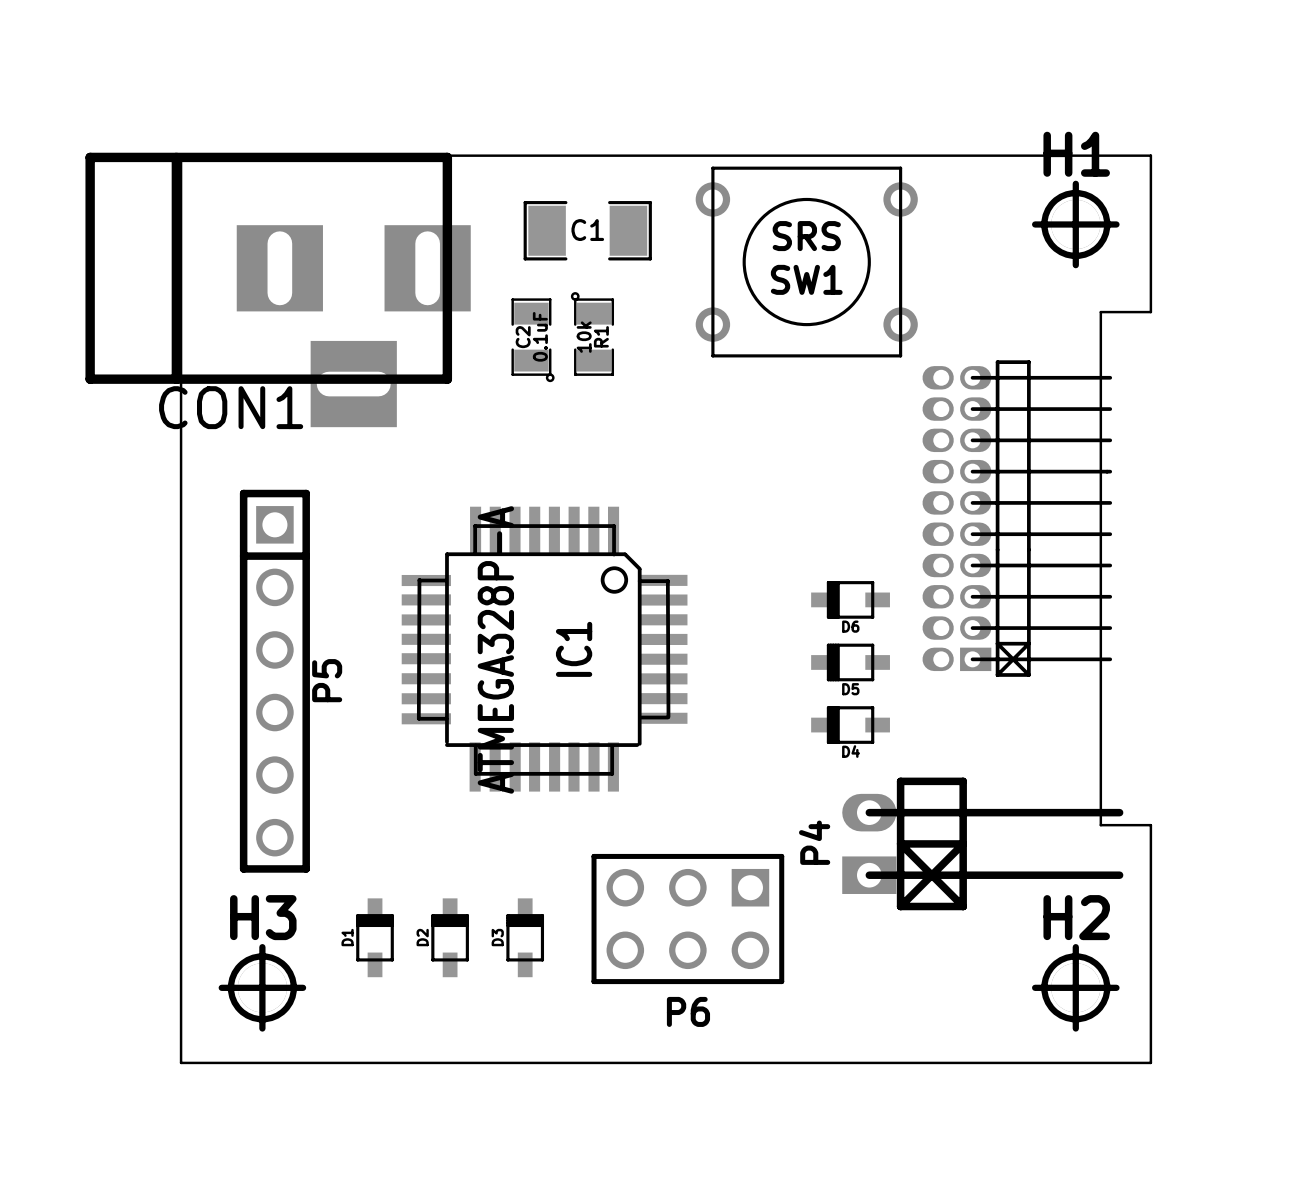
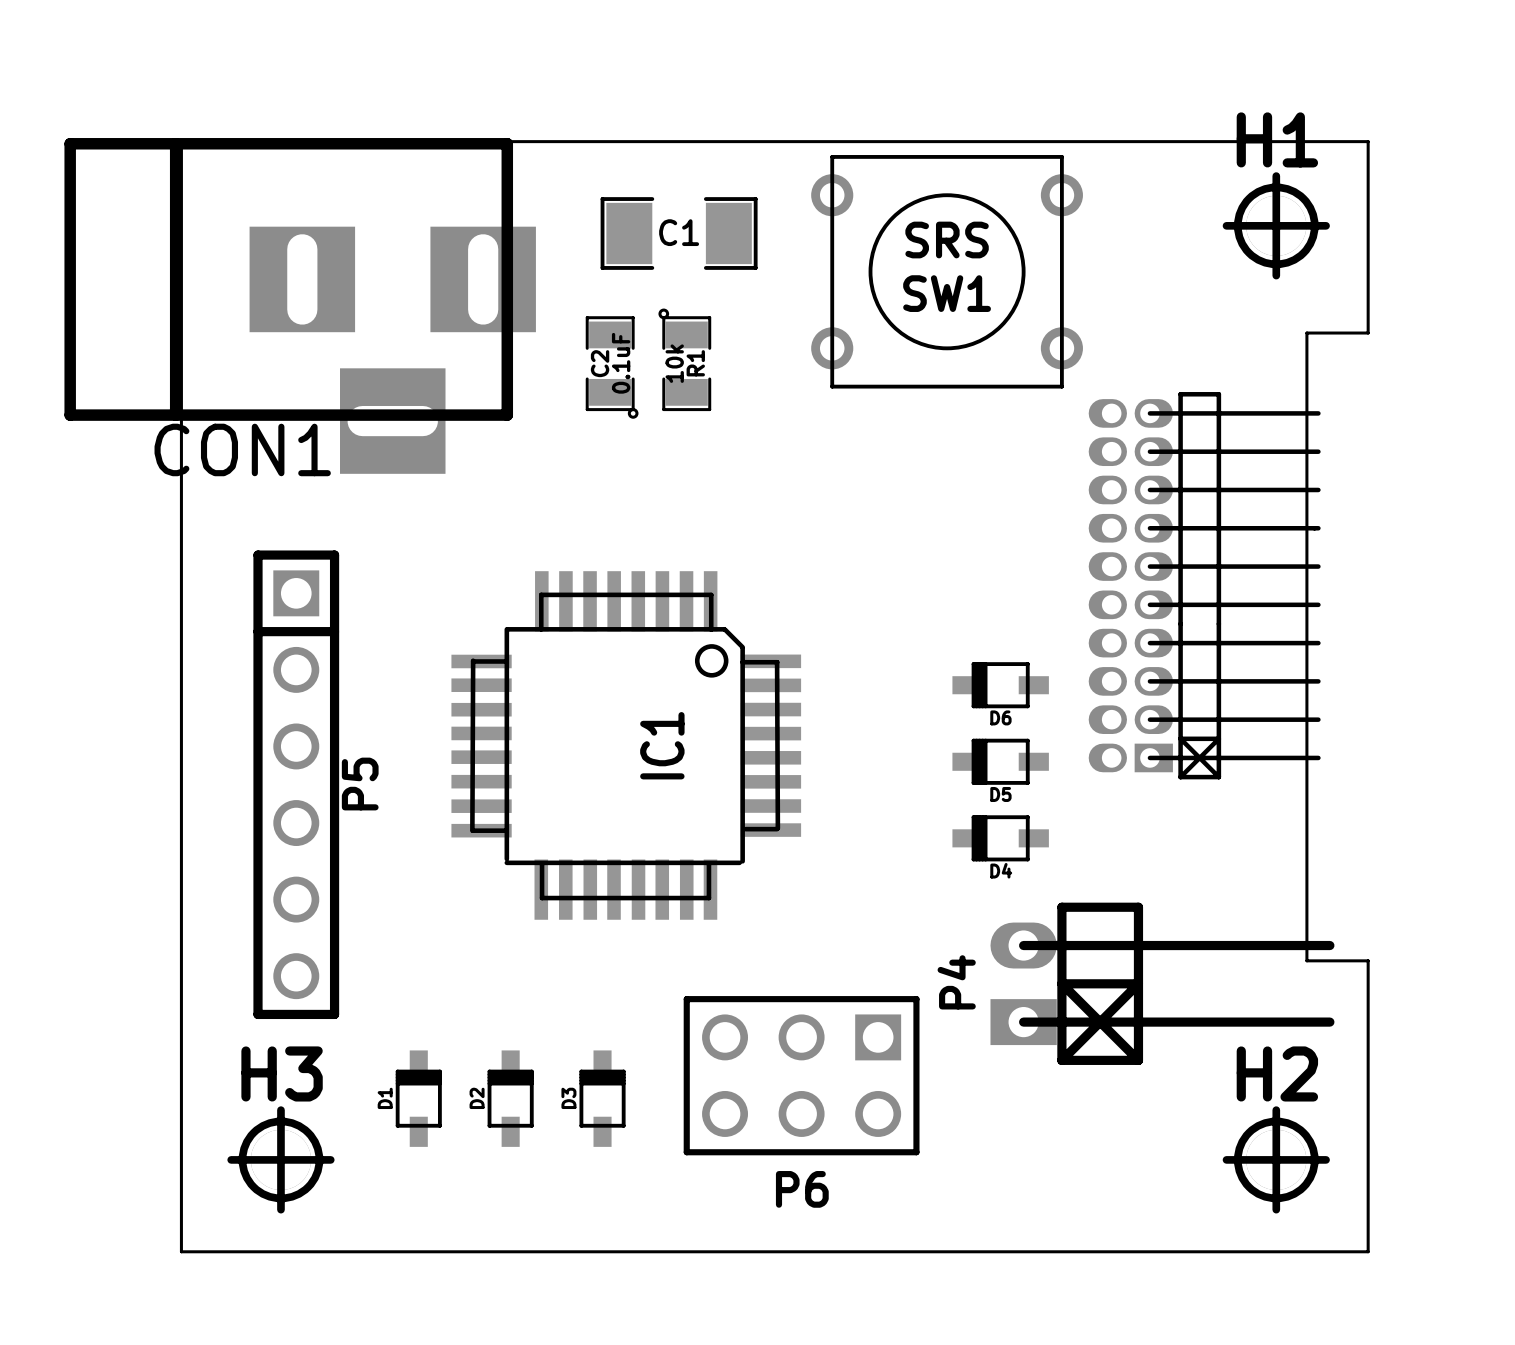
IC1 value: ATMEGA328P-A (495, 649) -> none

